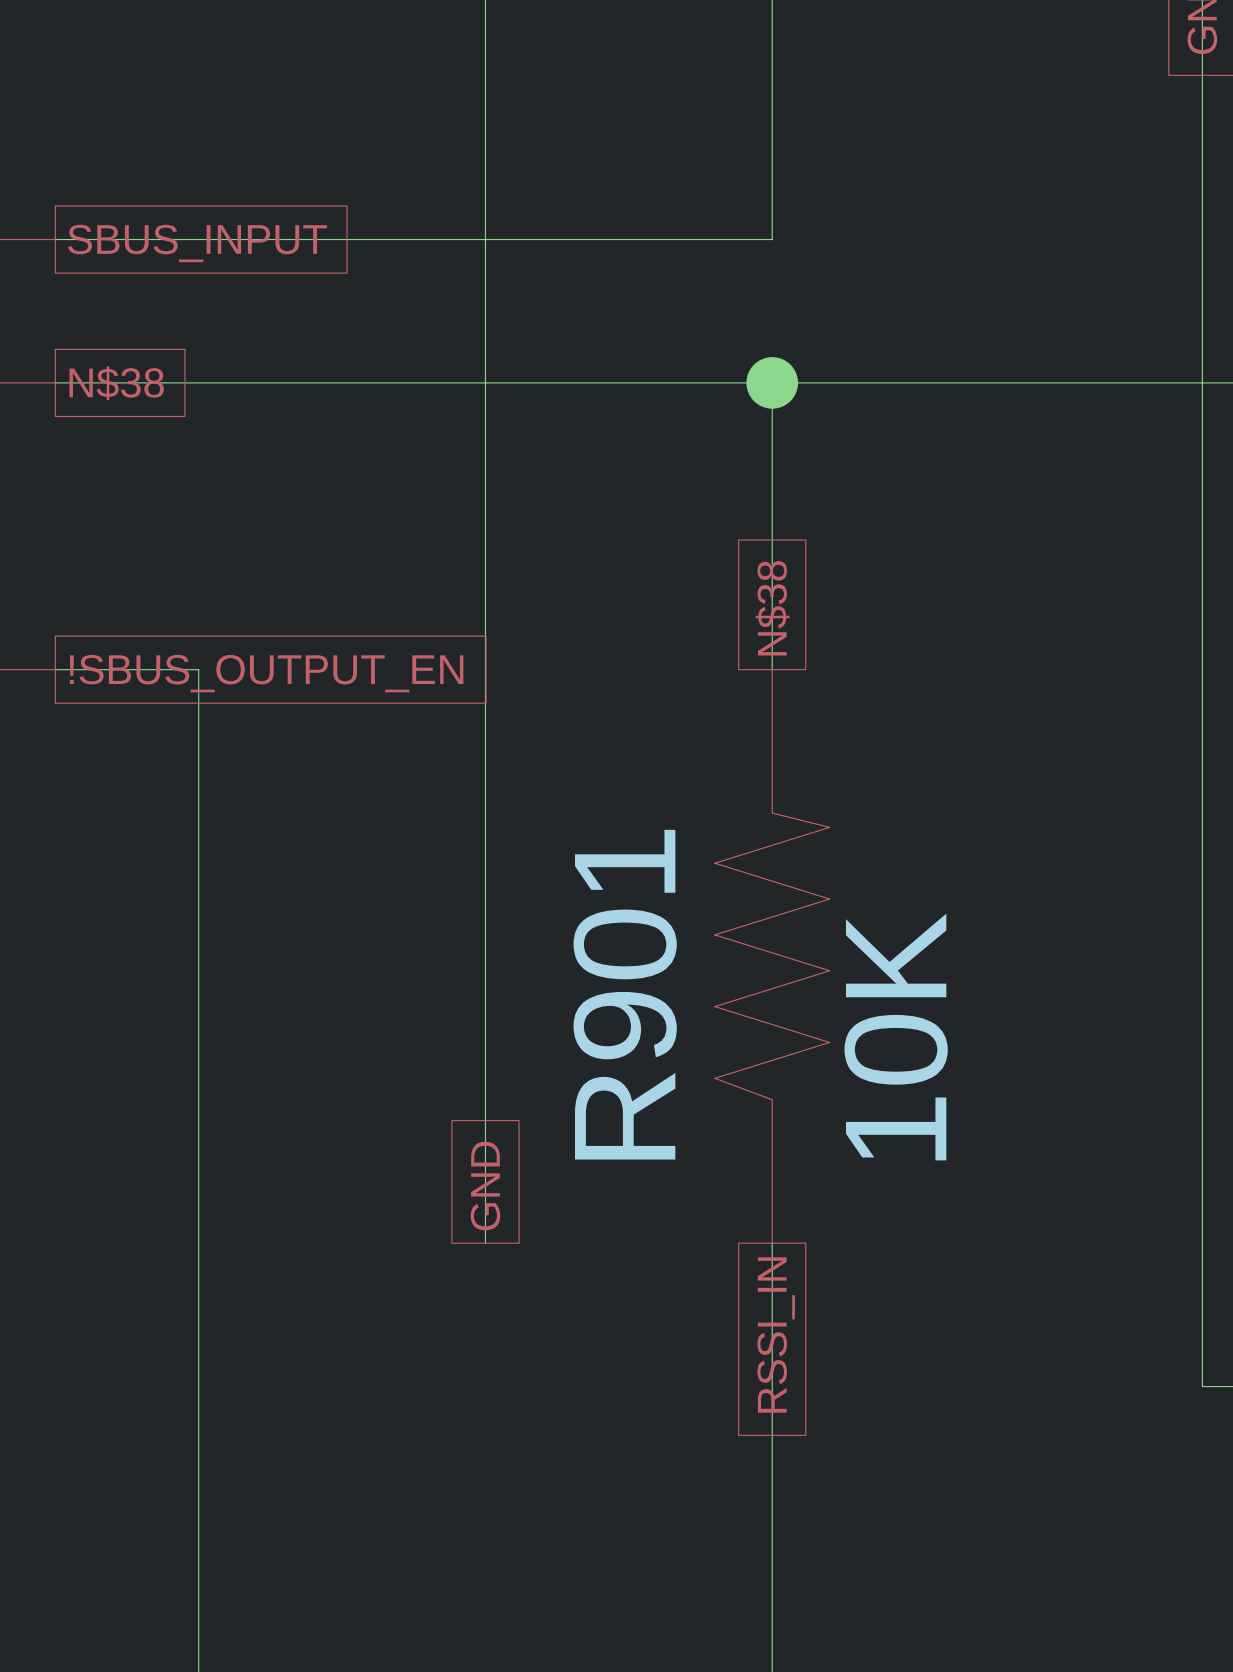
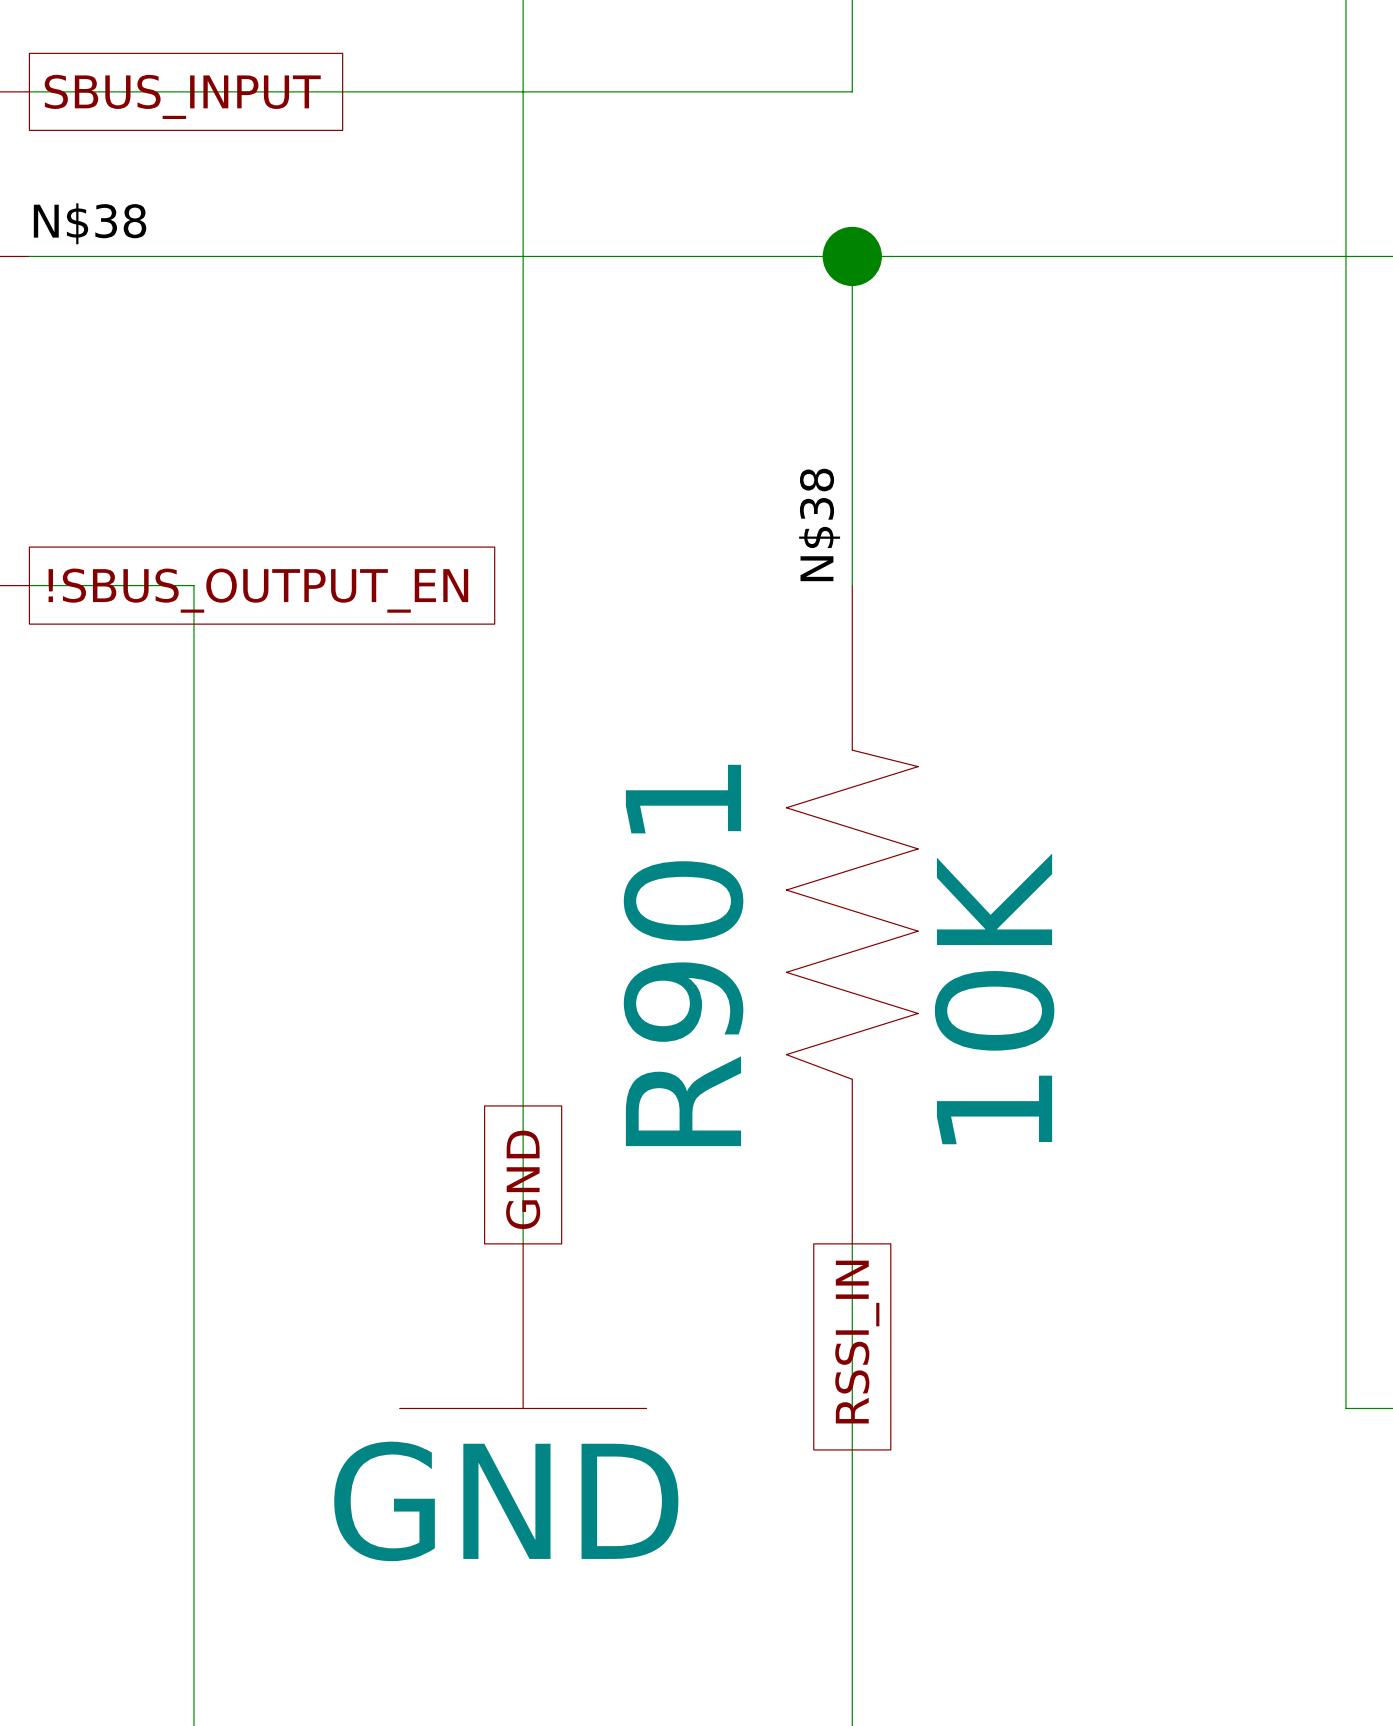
label: none -> N$38 (90, 223)
global label: N$38 (116, 383) -> none
global label: N$38 (772, 608) -> none
label: none -> N$38 (819, 524)
power symbol: none -> GND (523, 1326)

